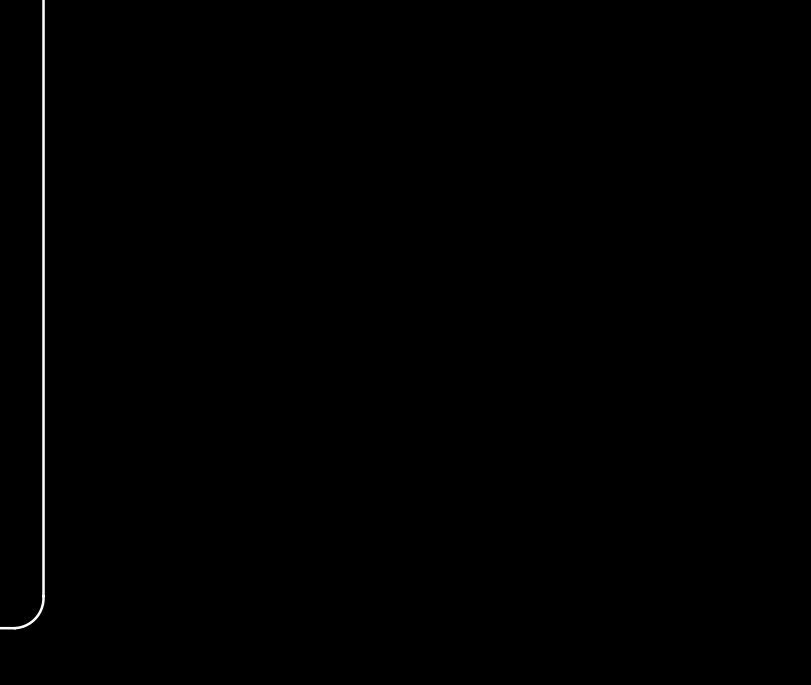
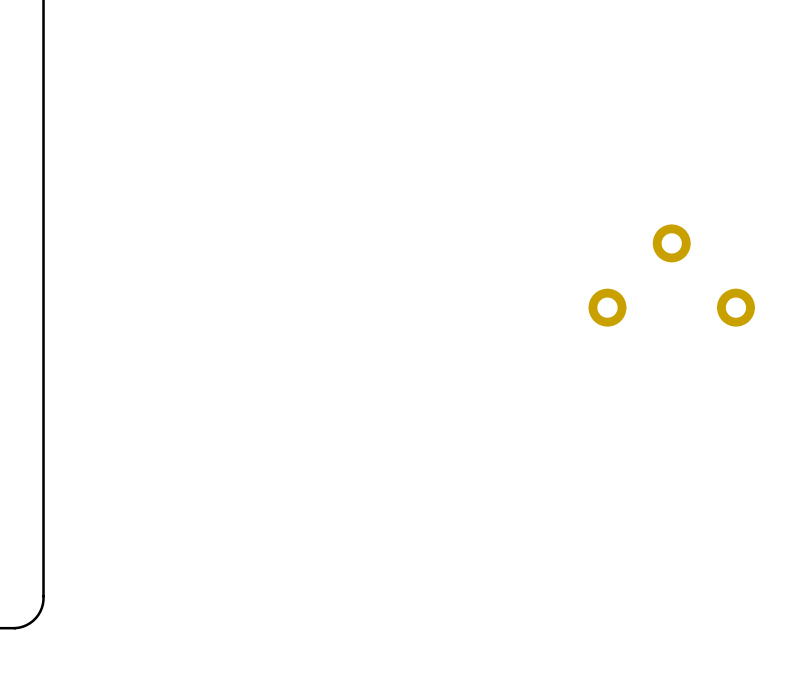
part: none -> (671, 275)

